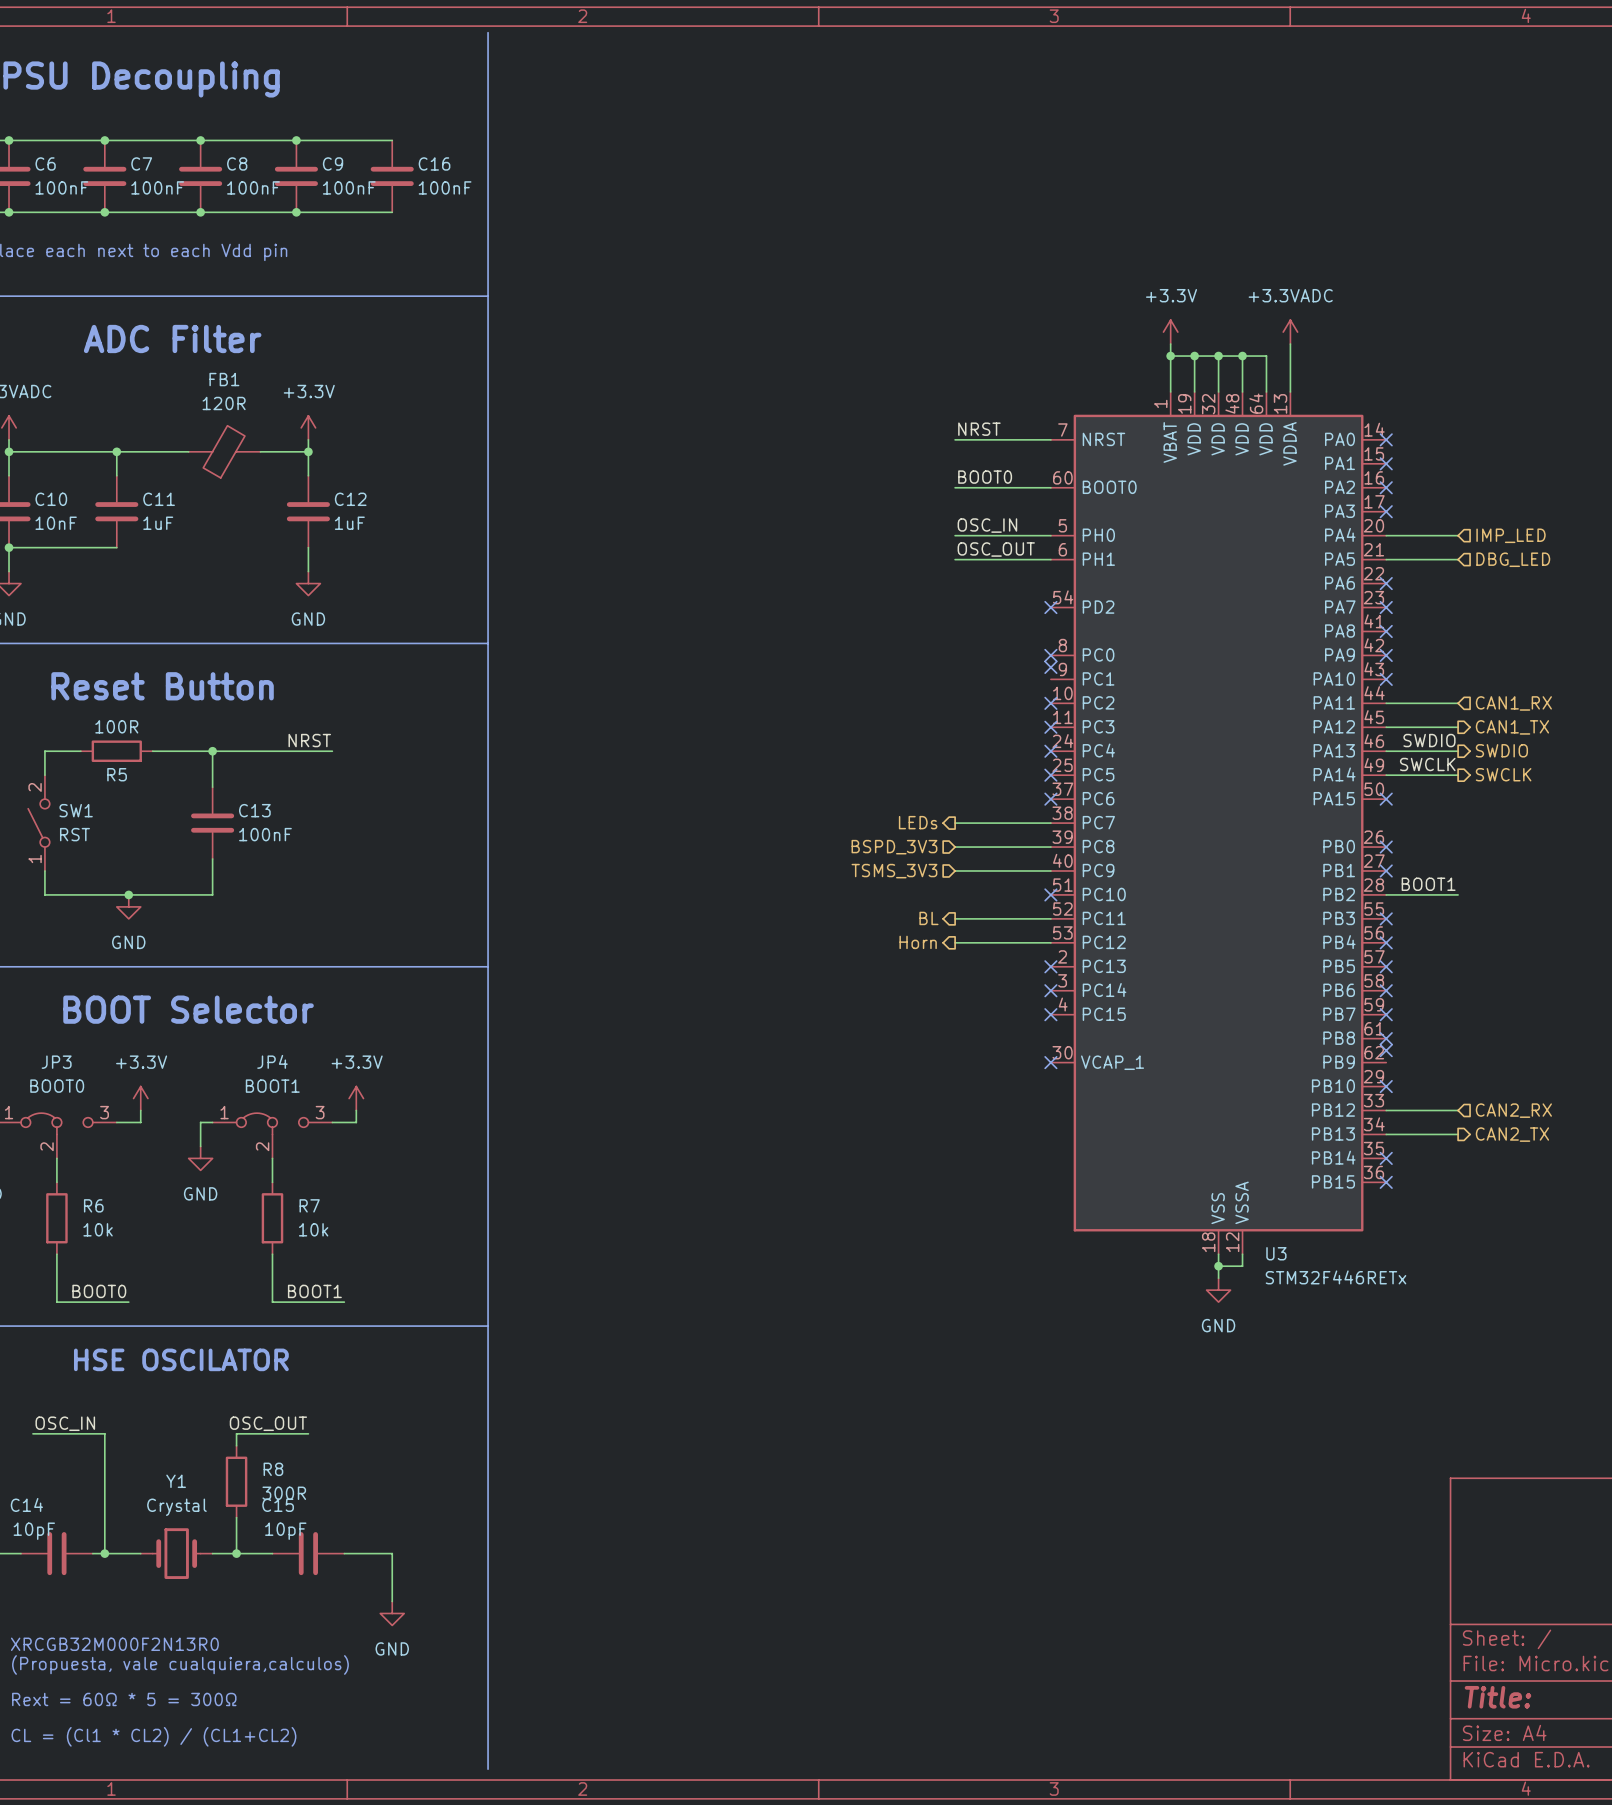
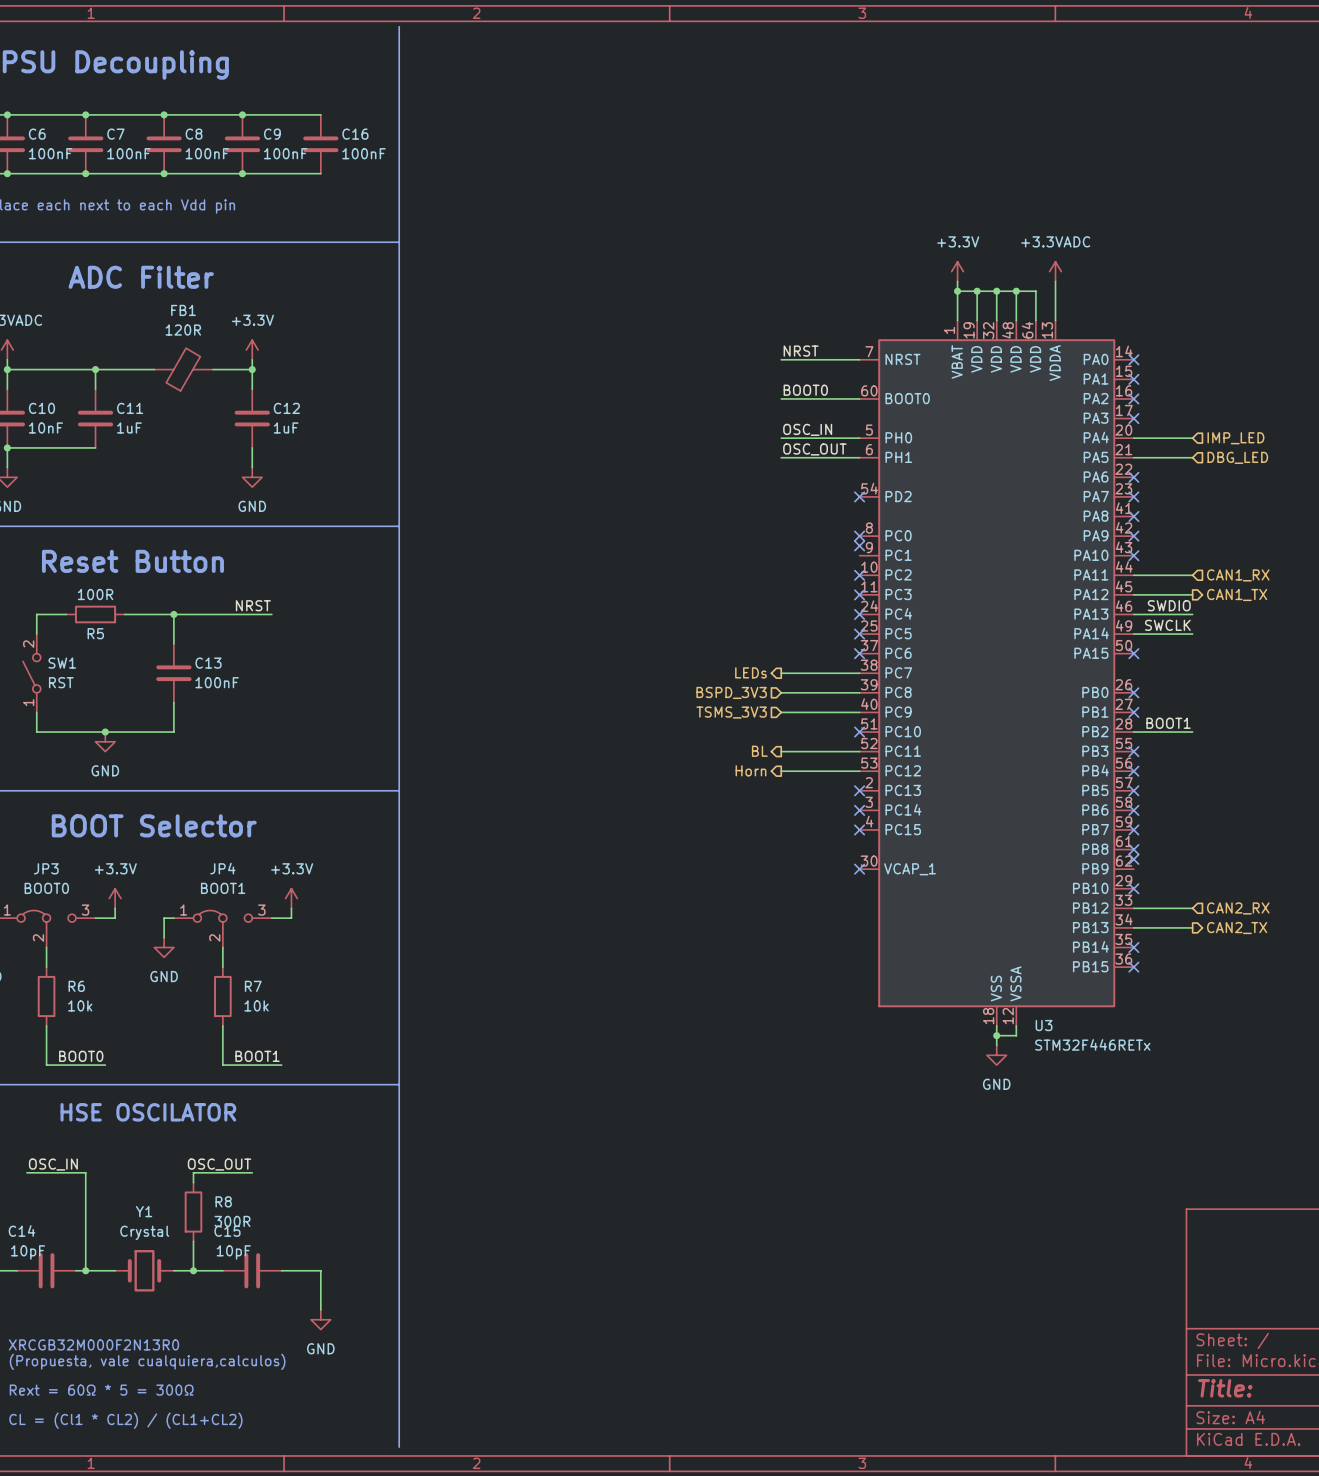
hierarchical label: SWDIO (1501, 750) -> none
hierarchical label: SWCLK (1503, 774) -> none

